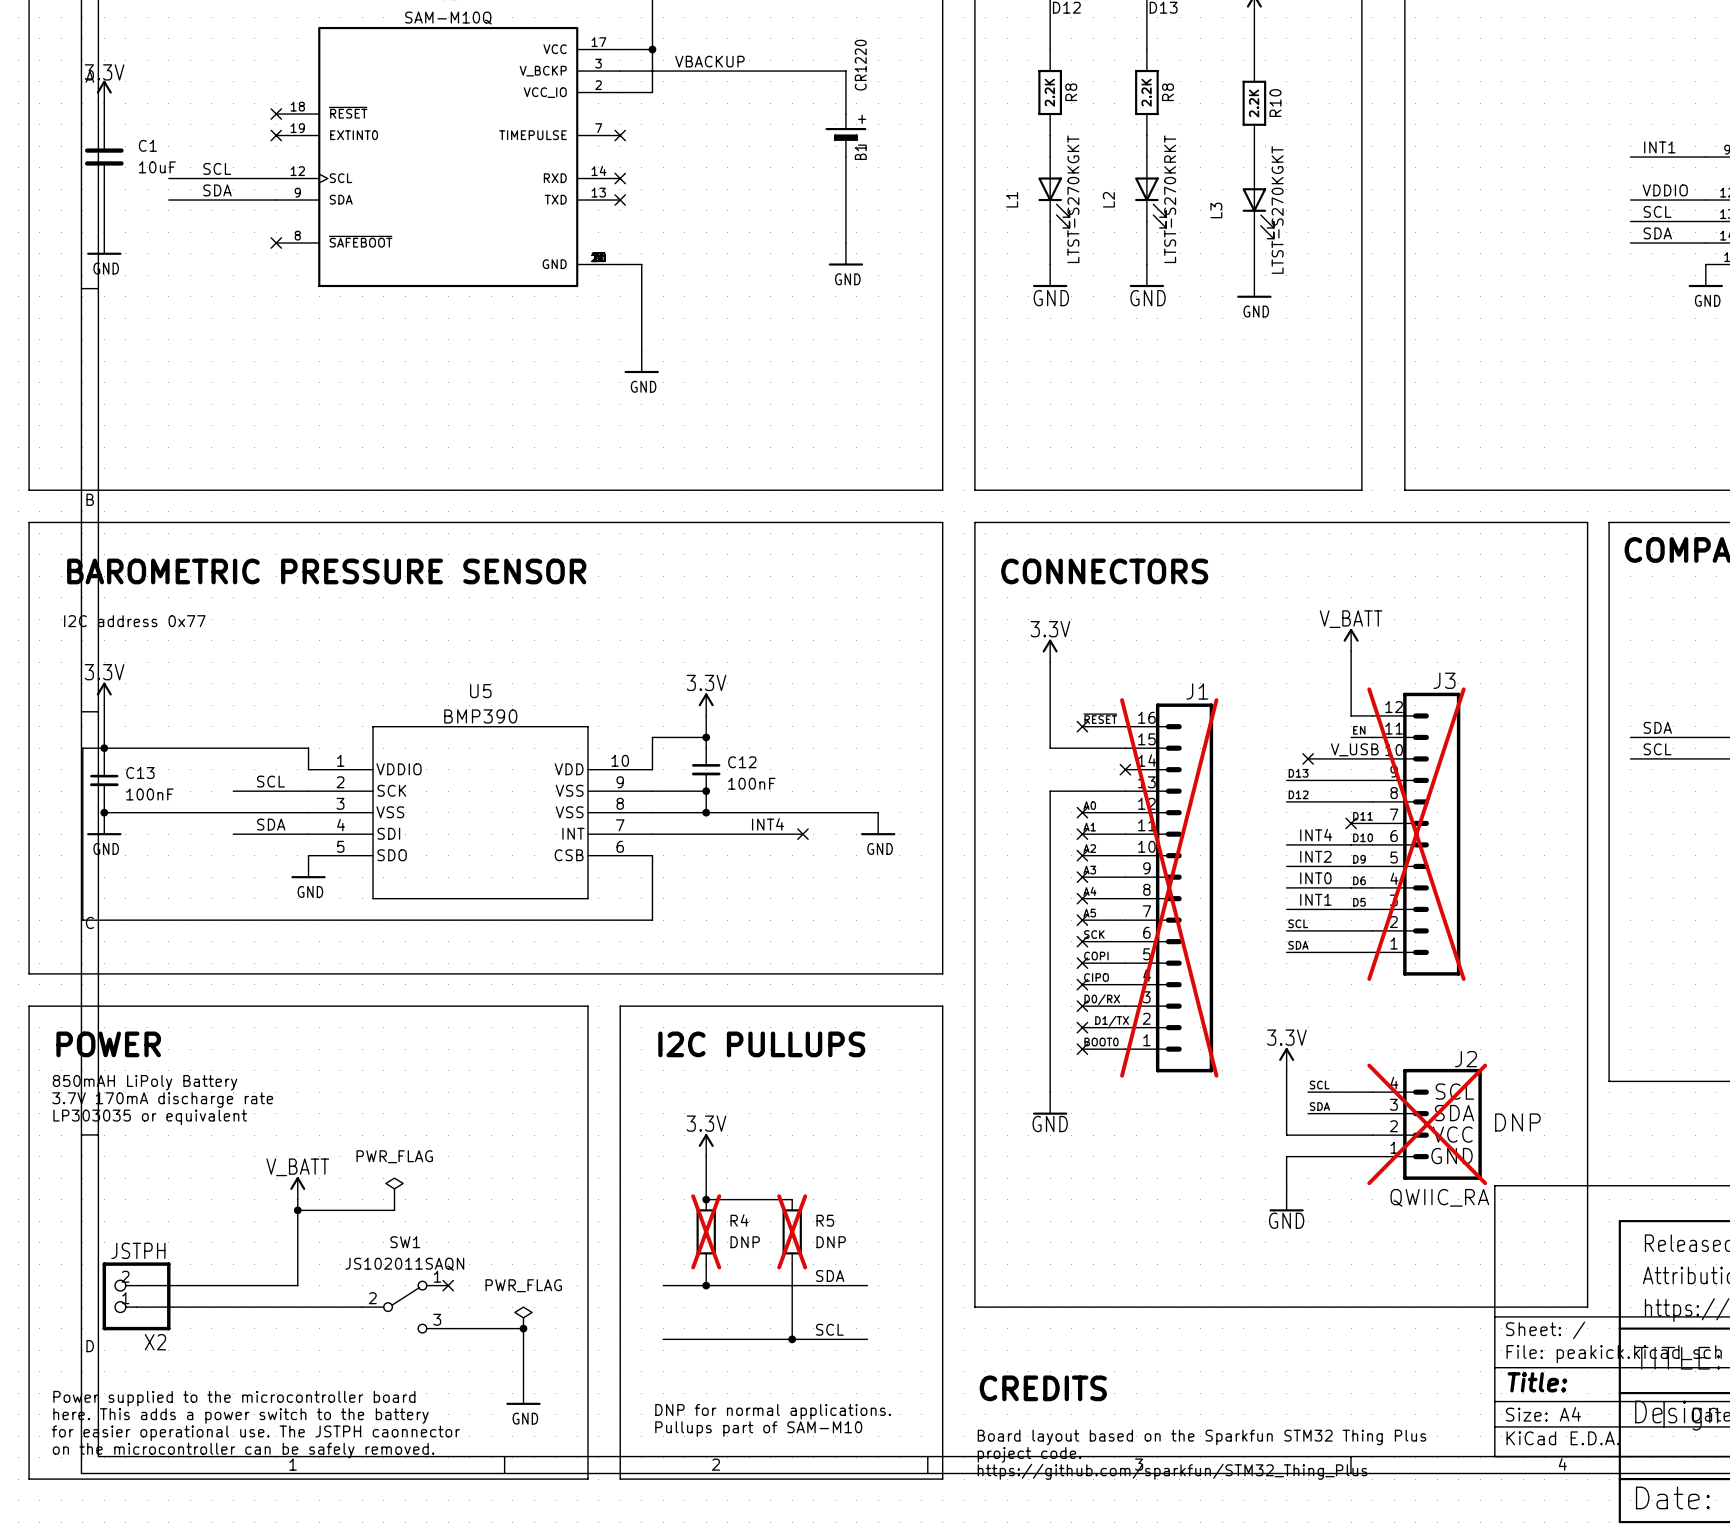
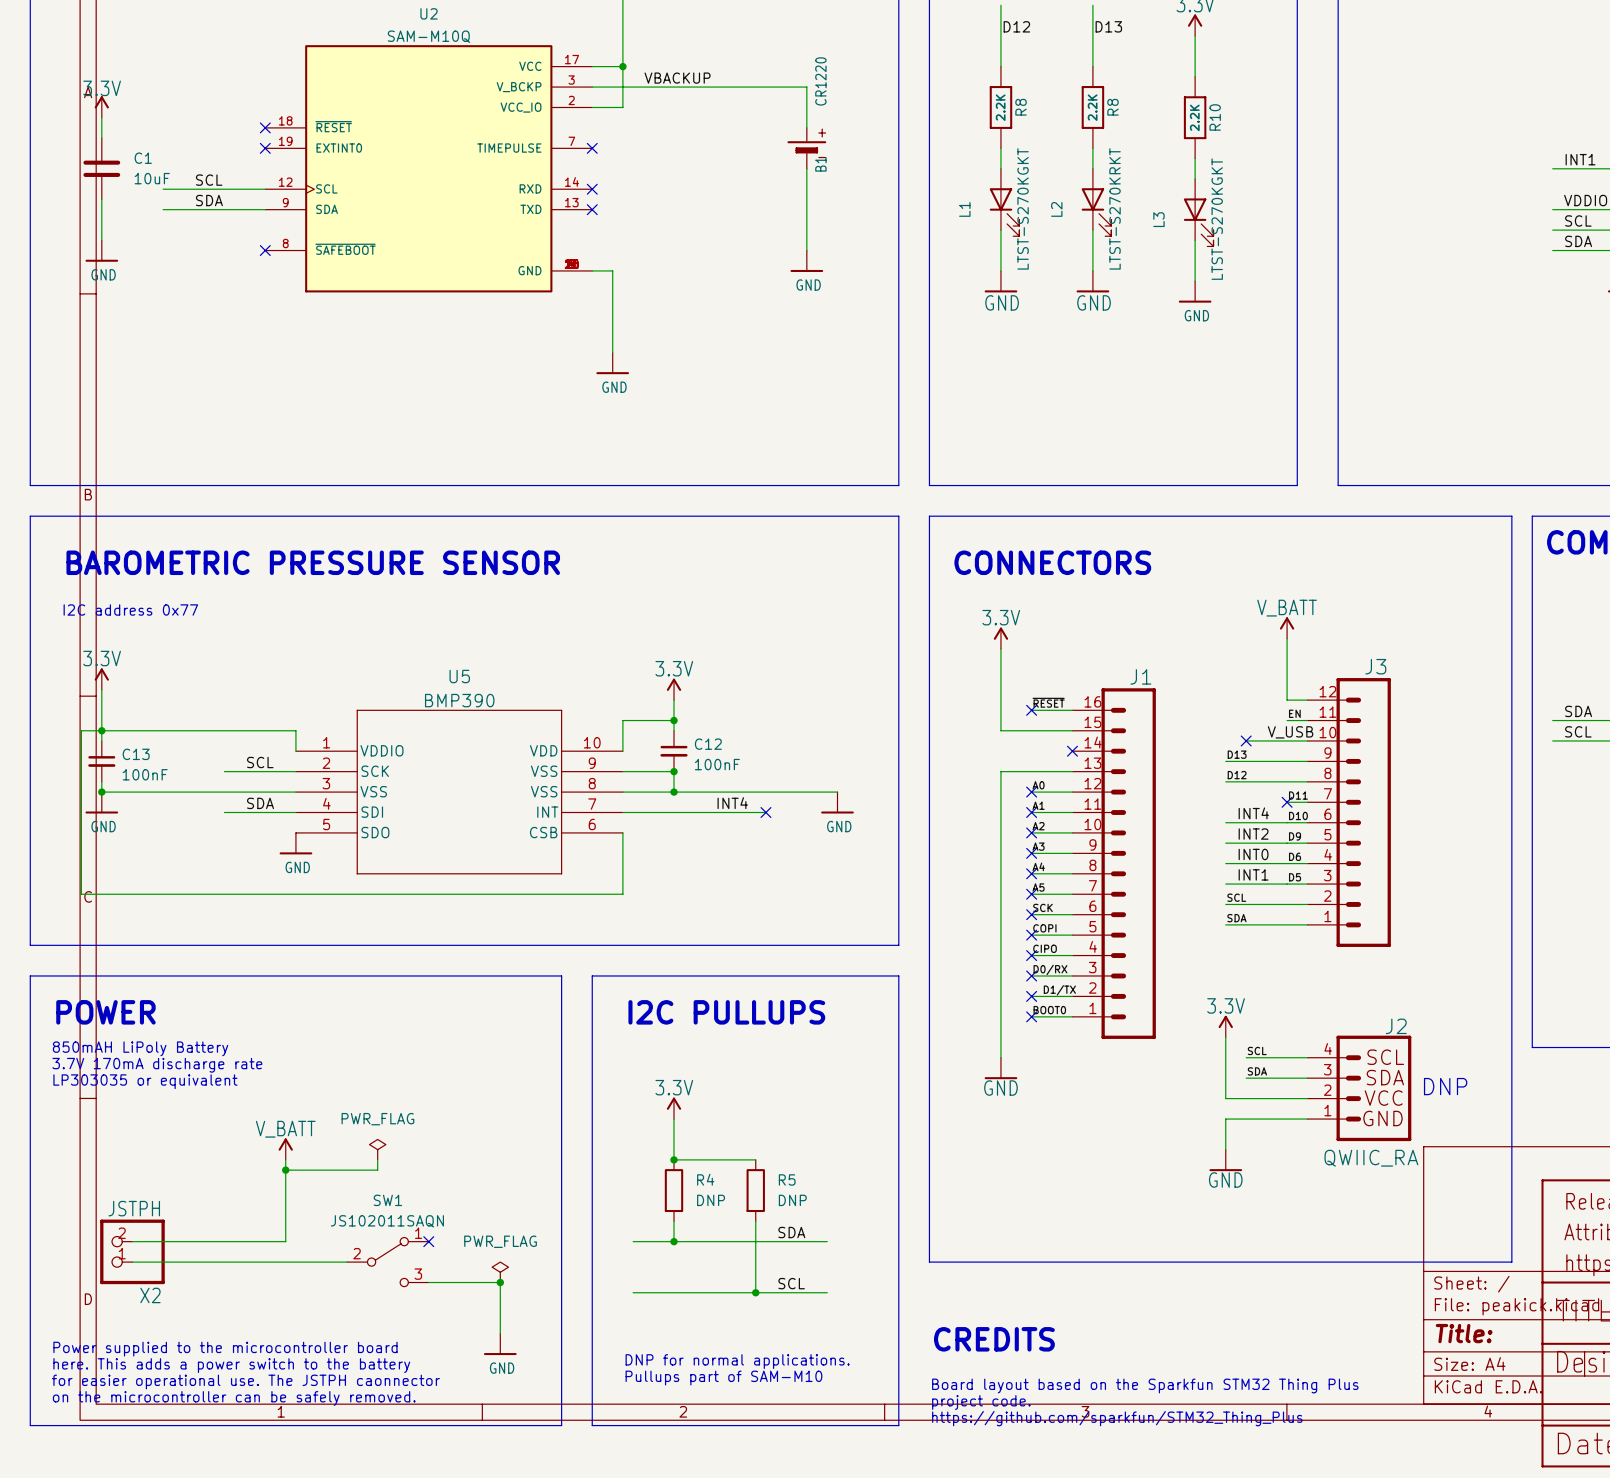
J3 do-not-place cross: (1416, 834) -> none
J1 do-not-place cross: (1169, 887) -> none
J2 do-not-place cross: (1427, 1124) -> none
R4 do-not-place cross: (706, 1231) -> none
R5 do-not-place cross: (792, 1231) -> none

